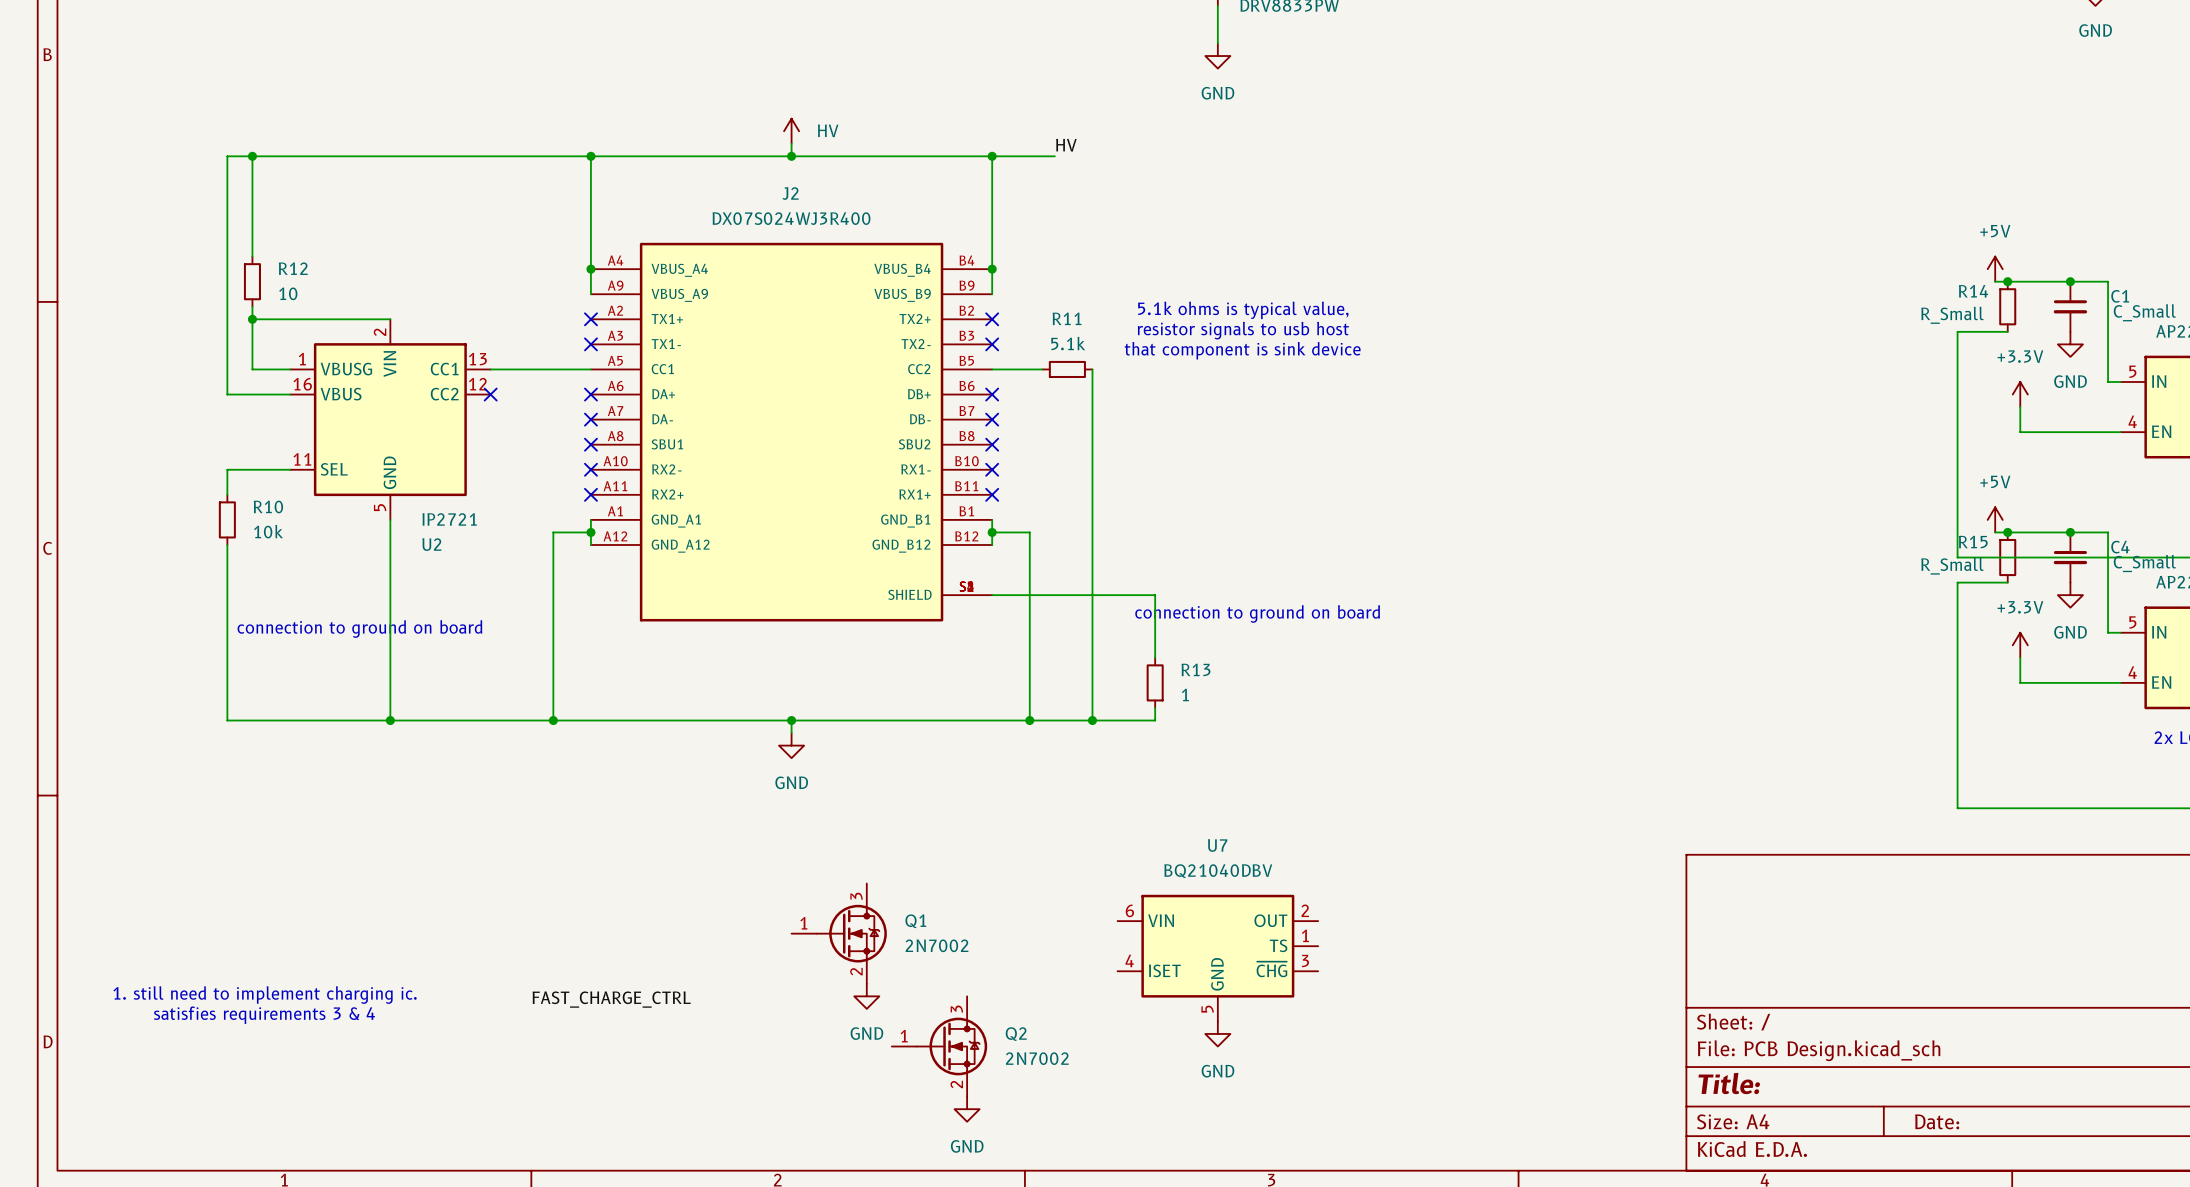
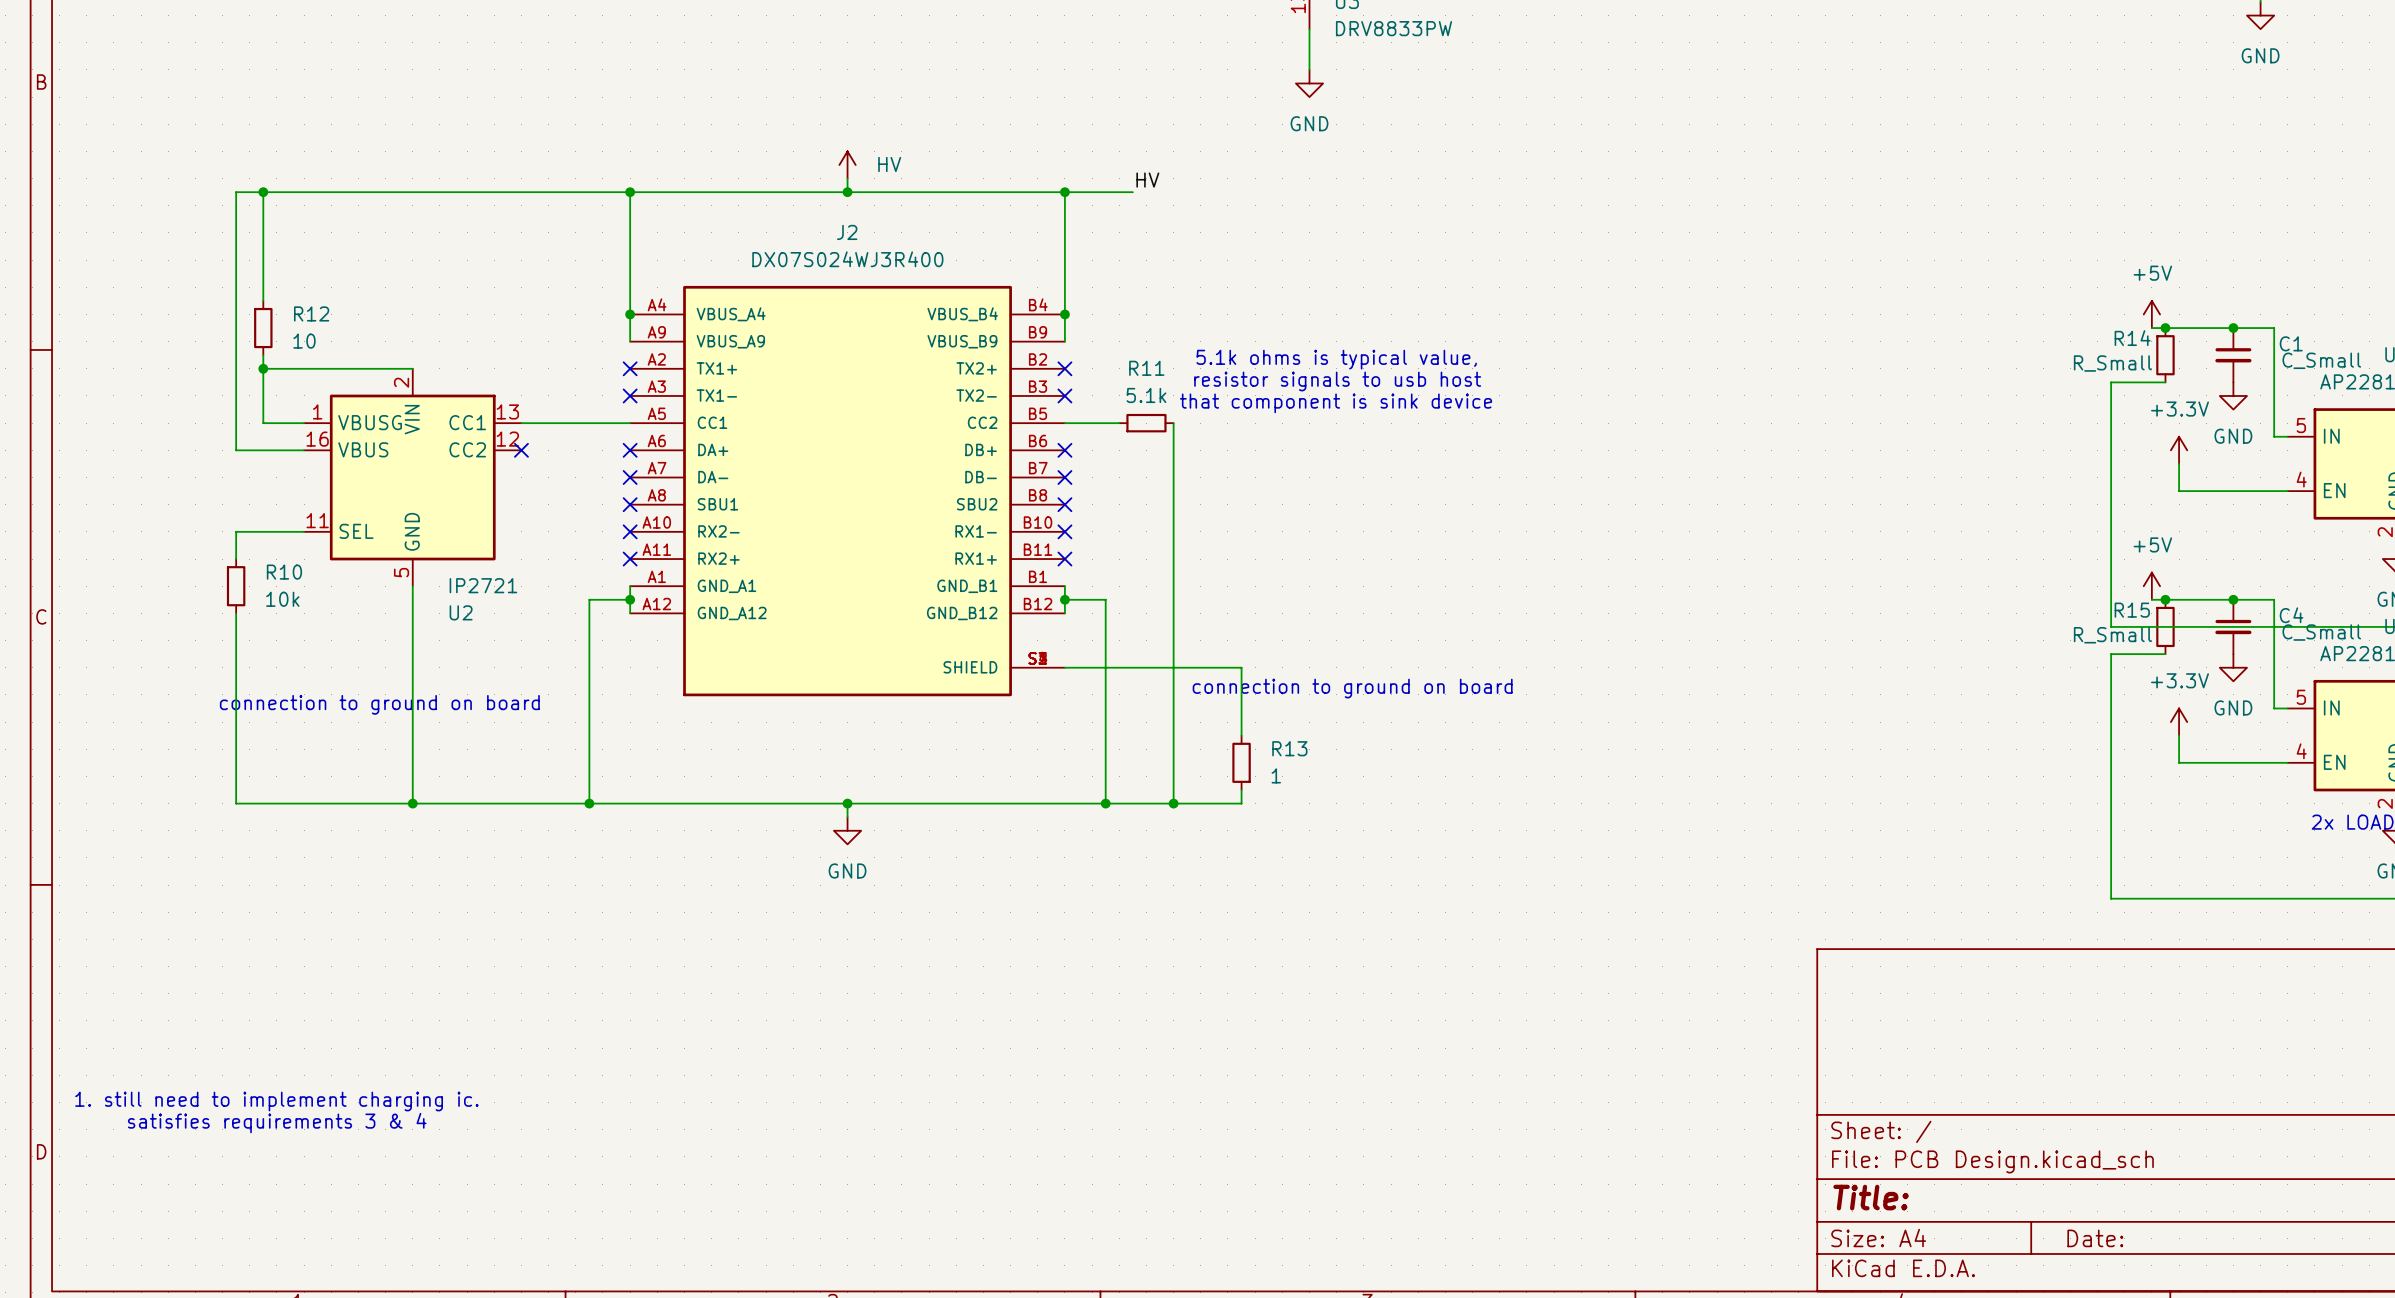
Q1: 2N7002 (839, 933) -> none
U7: BQ21040DBV (1217, 958) -> none
power symbol: GND (866, 996) -> none
label: FAST_CHARGE_CTRL (611, 999) -> none
power symbol: GND (1217, 1033) -> none
Q2: 2N7002 (939, 1046) -> none
power symbol: GND (967, 1109) -> none

